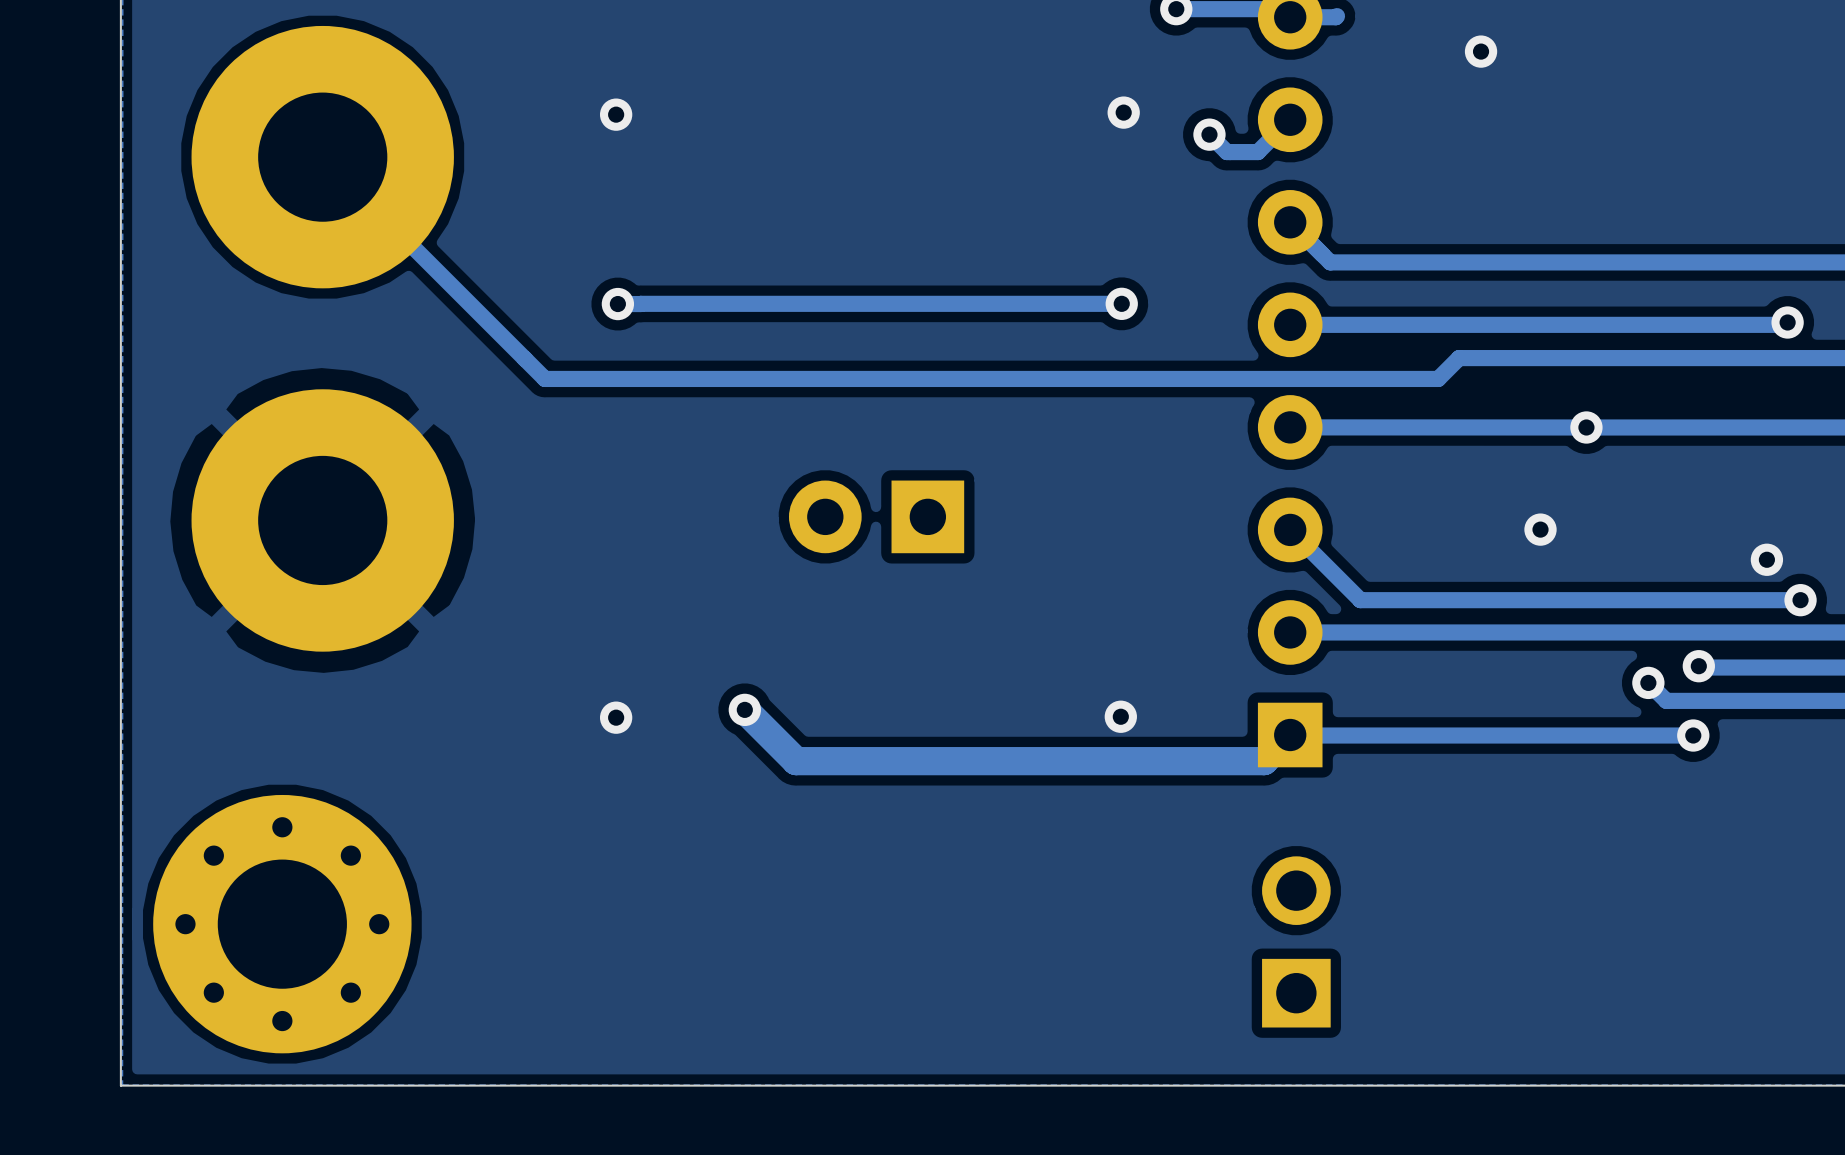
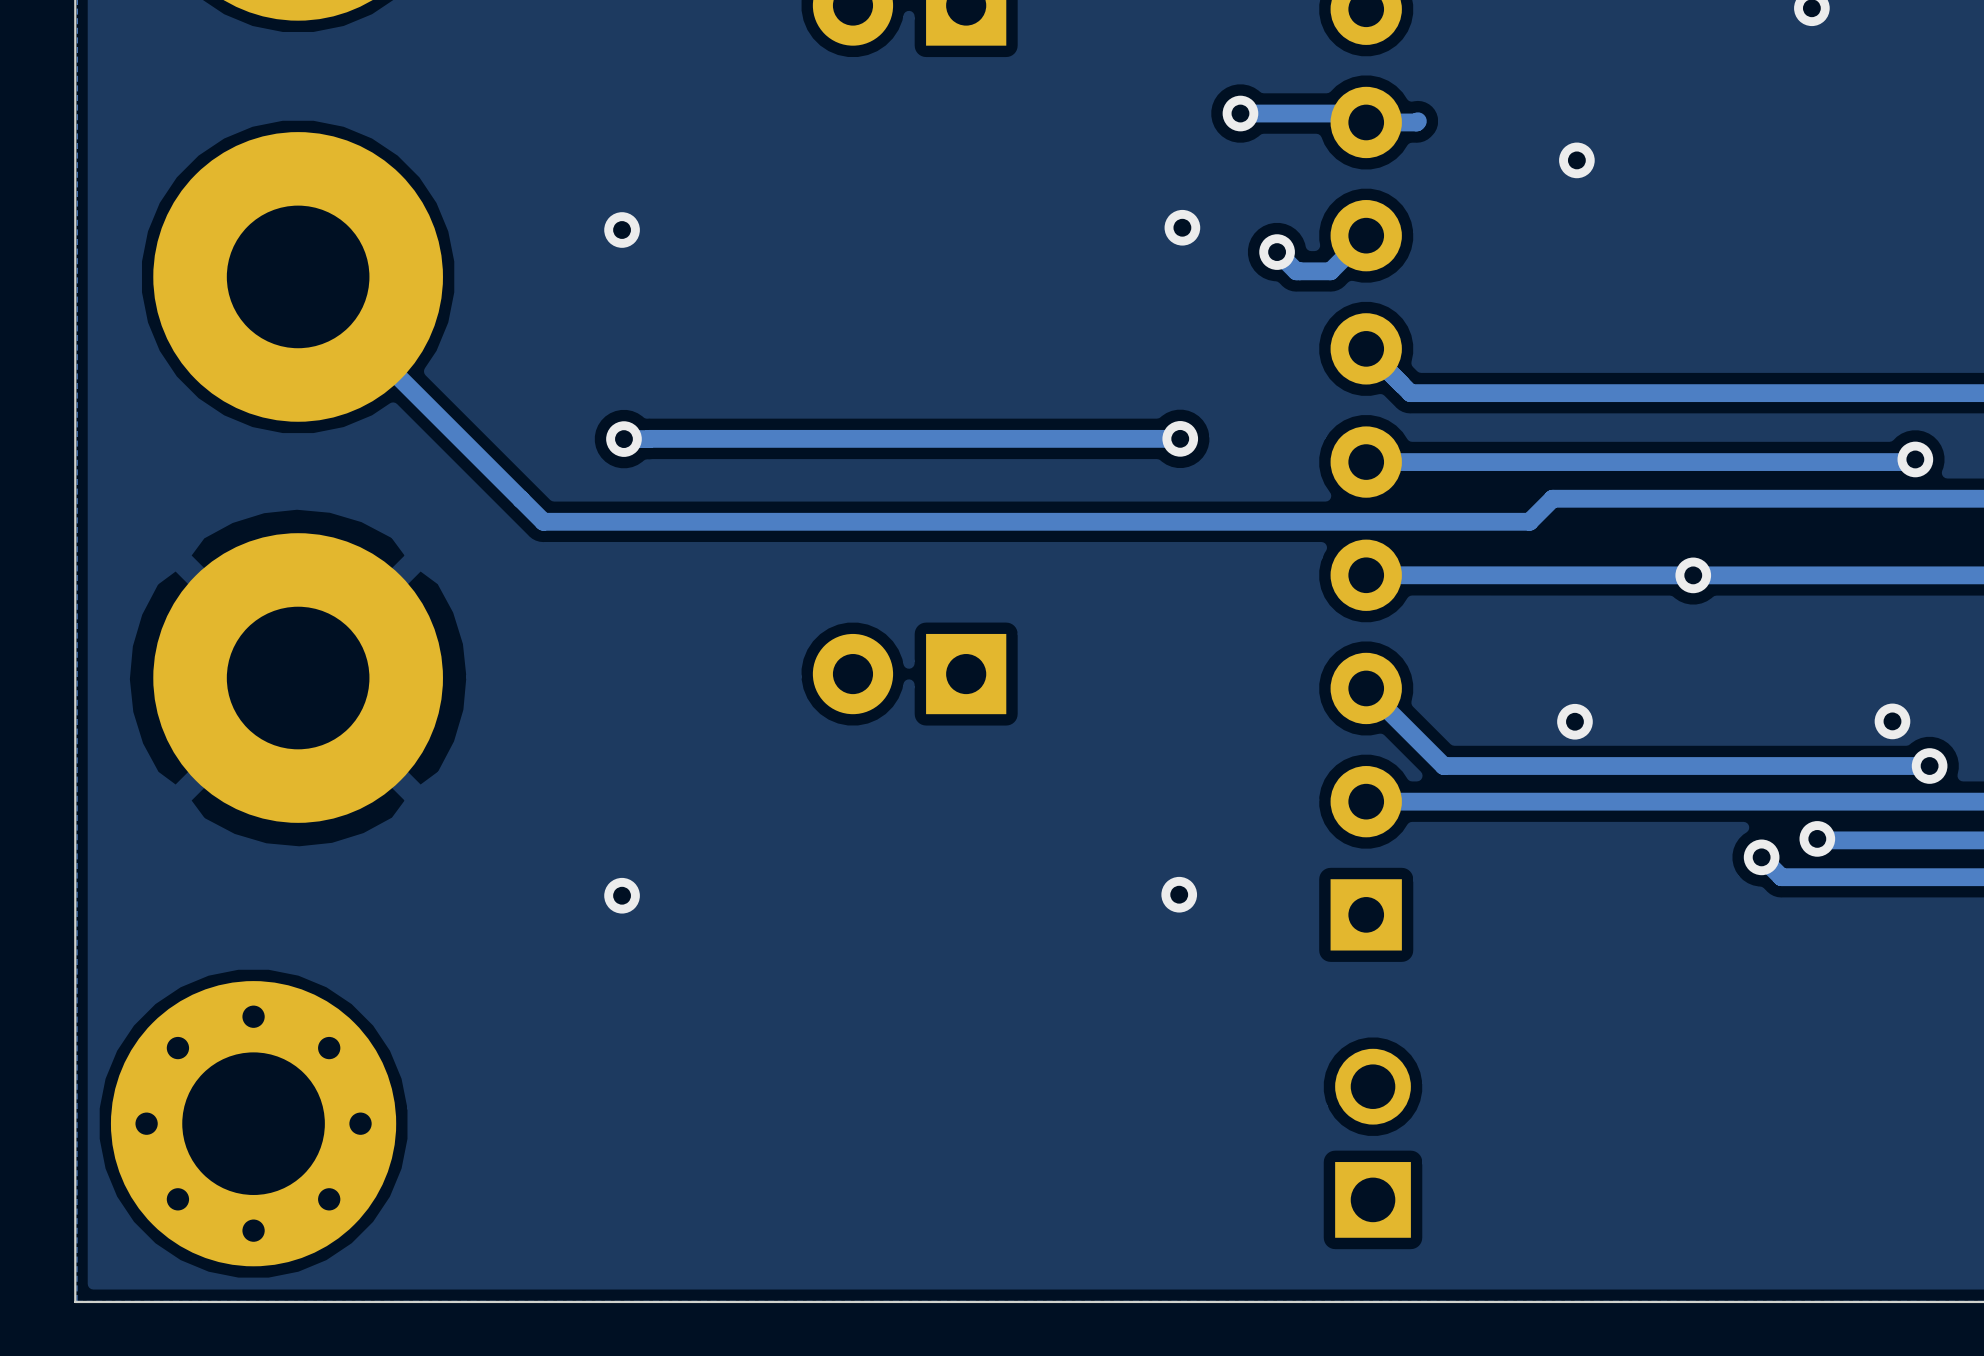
via position: (1540, 529) -> (1574, 721)
track: (744, 709) (796, 761) (1264, 761) (1290, 735) -> none
via: (744, 709) -> none
track: (1693, 735) (1290, 735) -> none
via: (1693, 735) -> none

